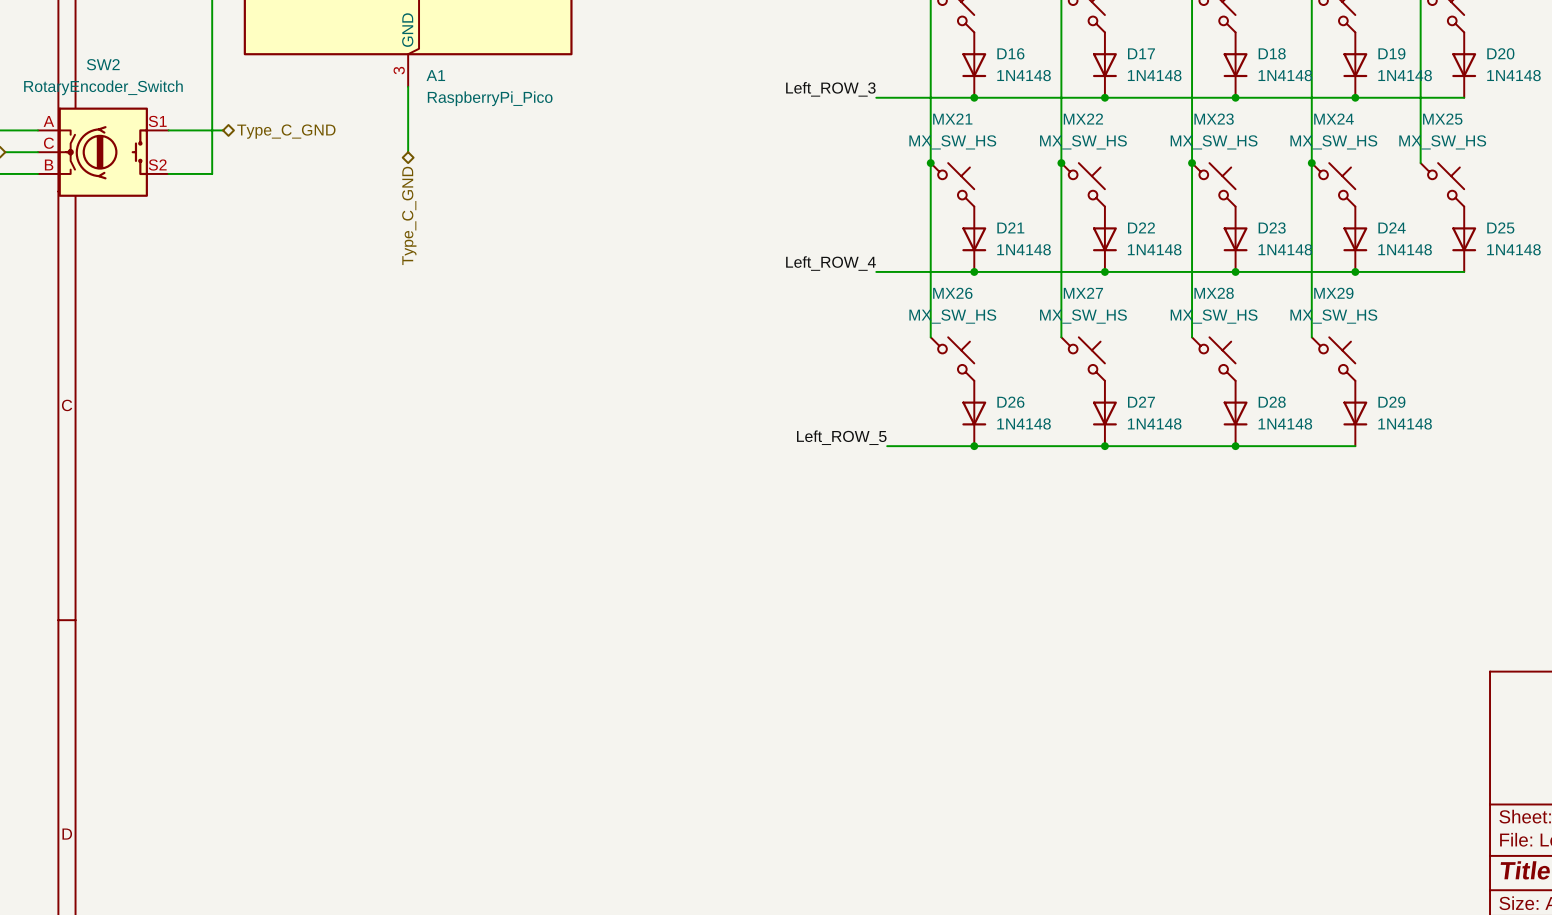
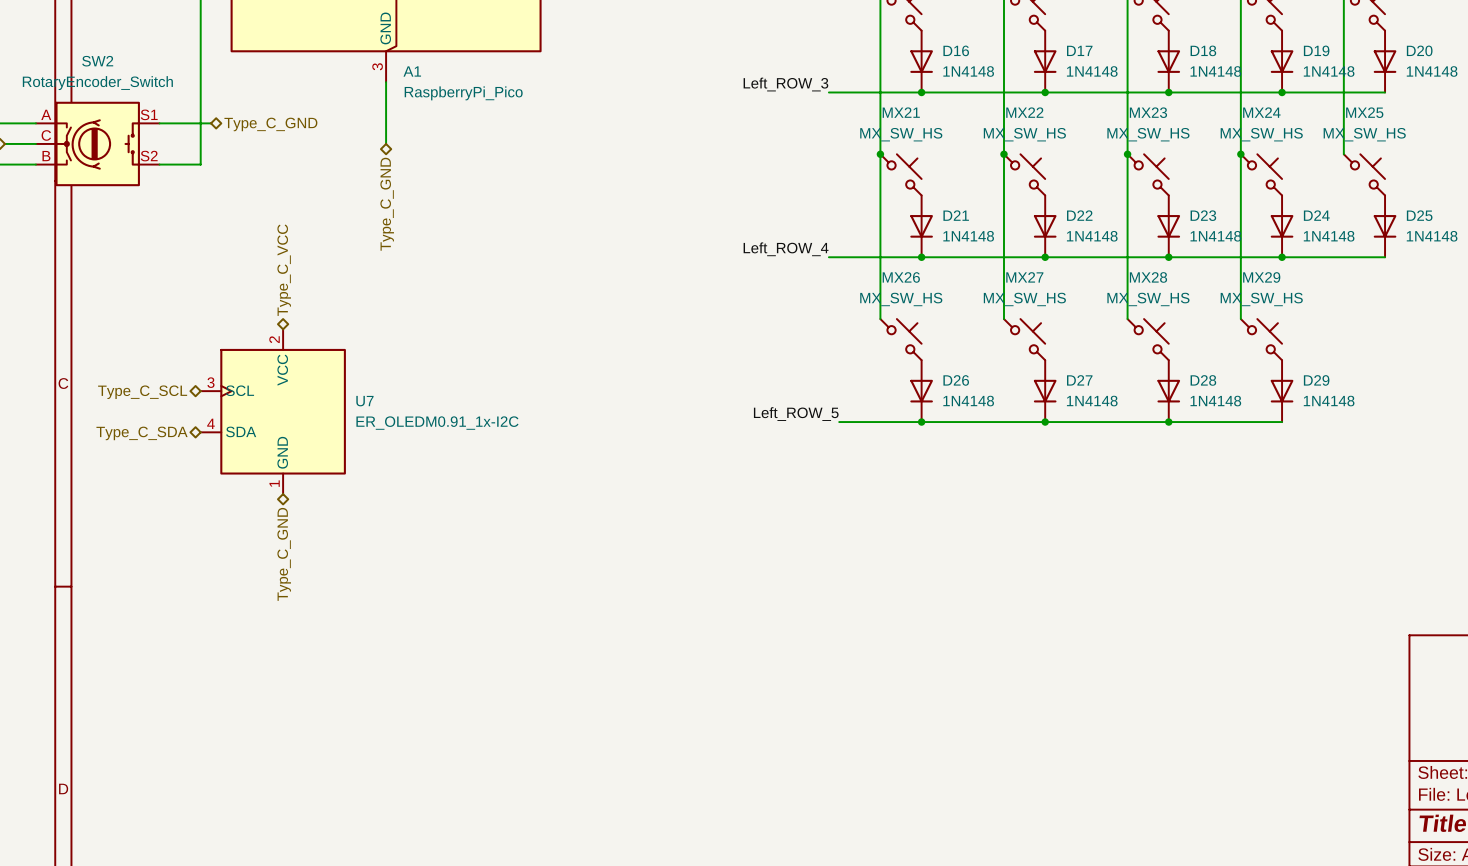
hierarchical label: none -> Type_C_VCC (284, 270)
hierarchical label: none -> Type_C_SCL (142, 392)
U7: none -> ER_OLEDM0.91_1x-I2C (273, 411)
hierarchical label: none -> Type_C_SDA (142, 433)
hierarchical label: none -> Type_C_GND (284, 554)

